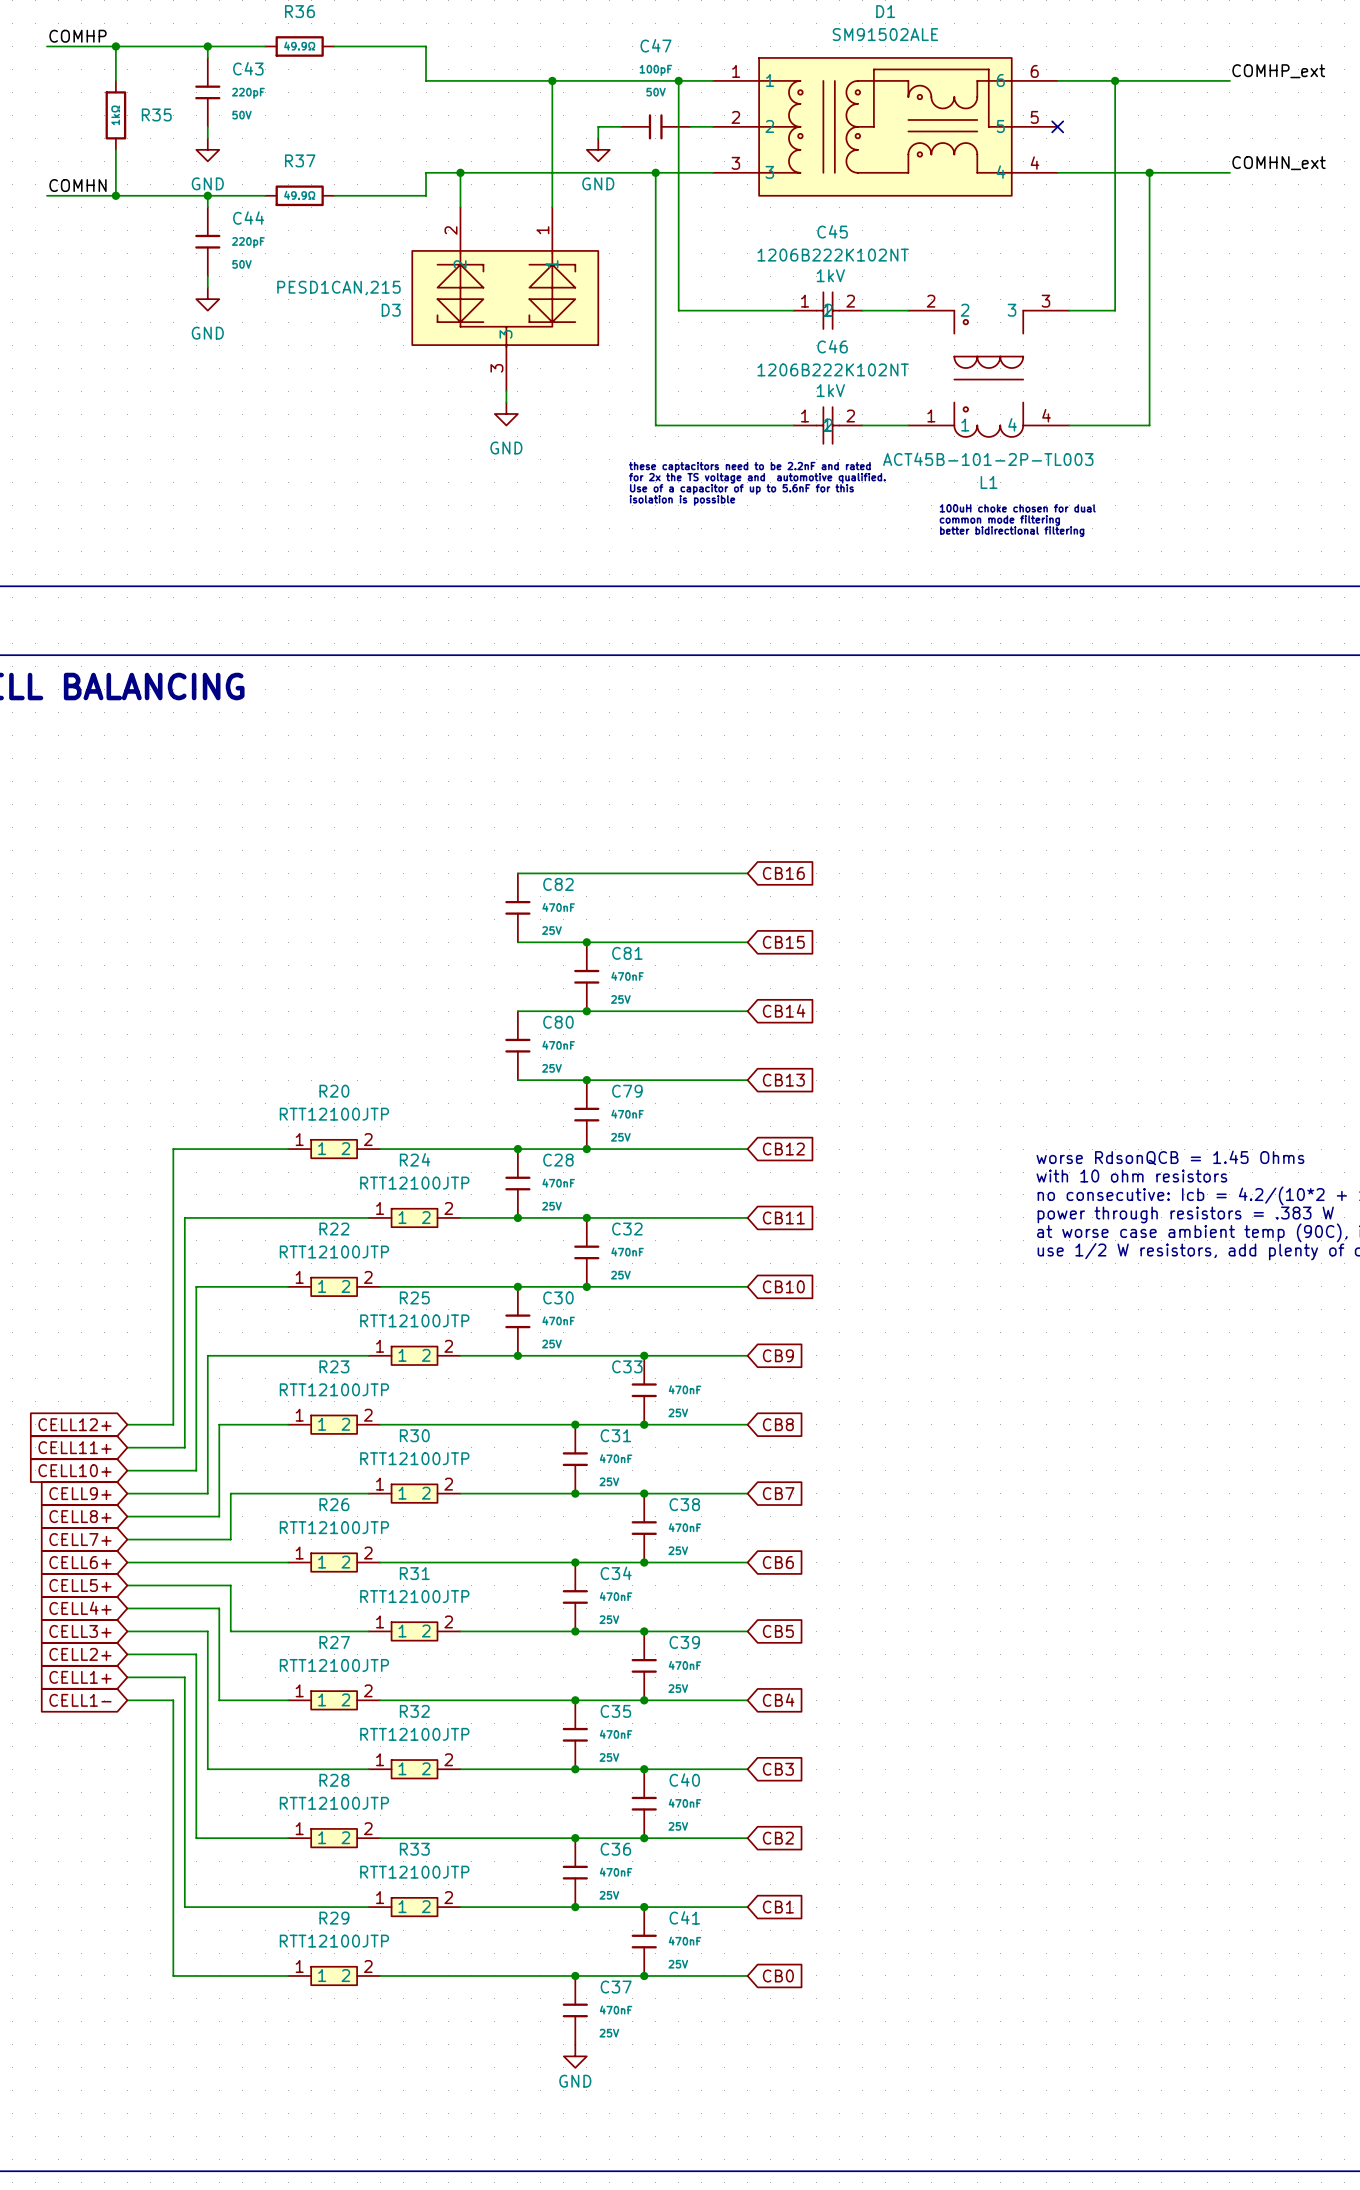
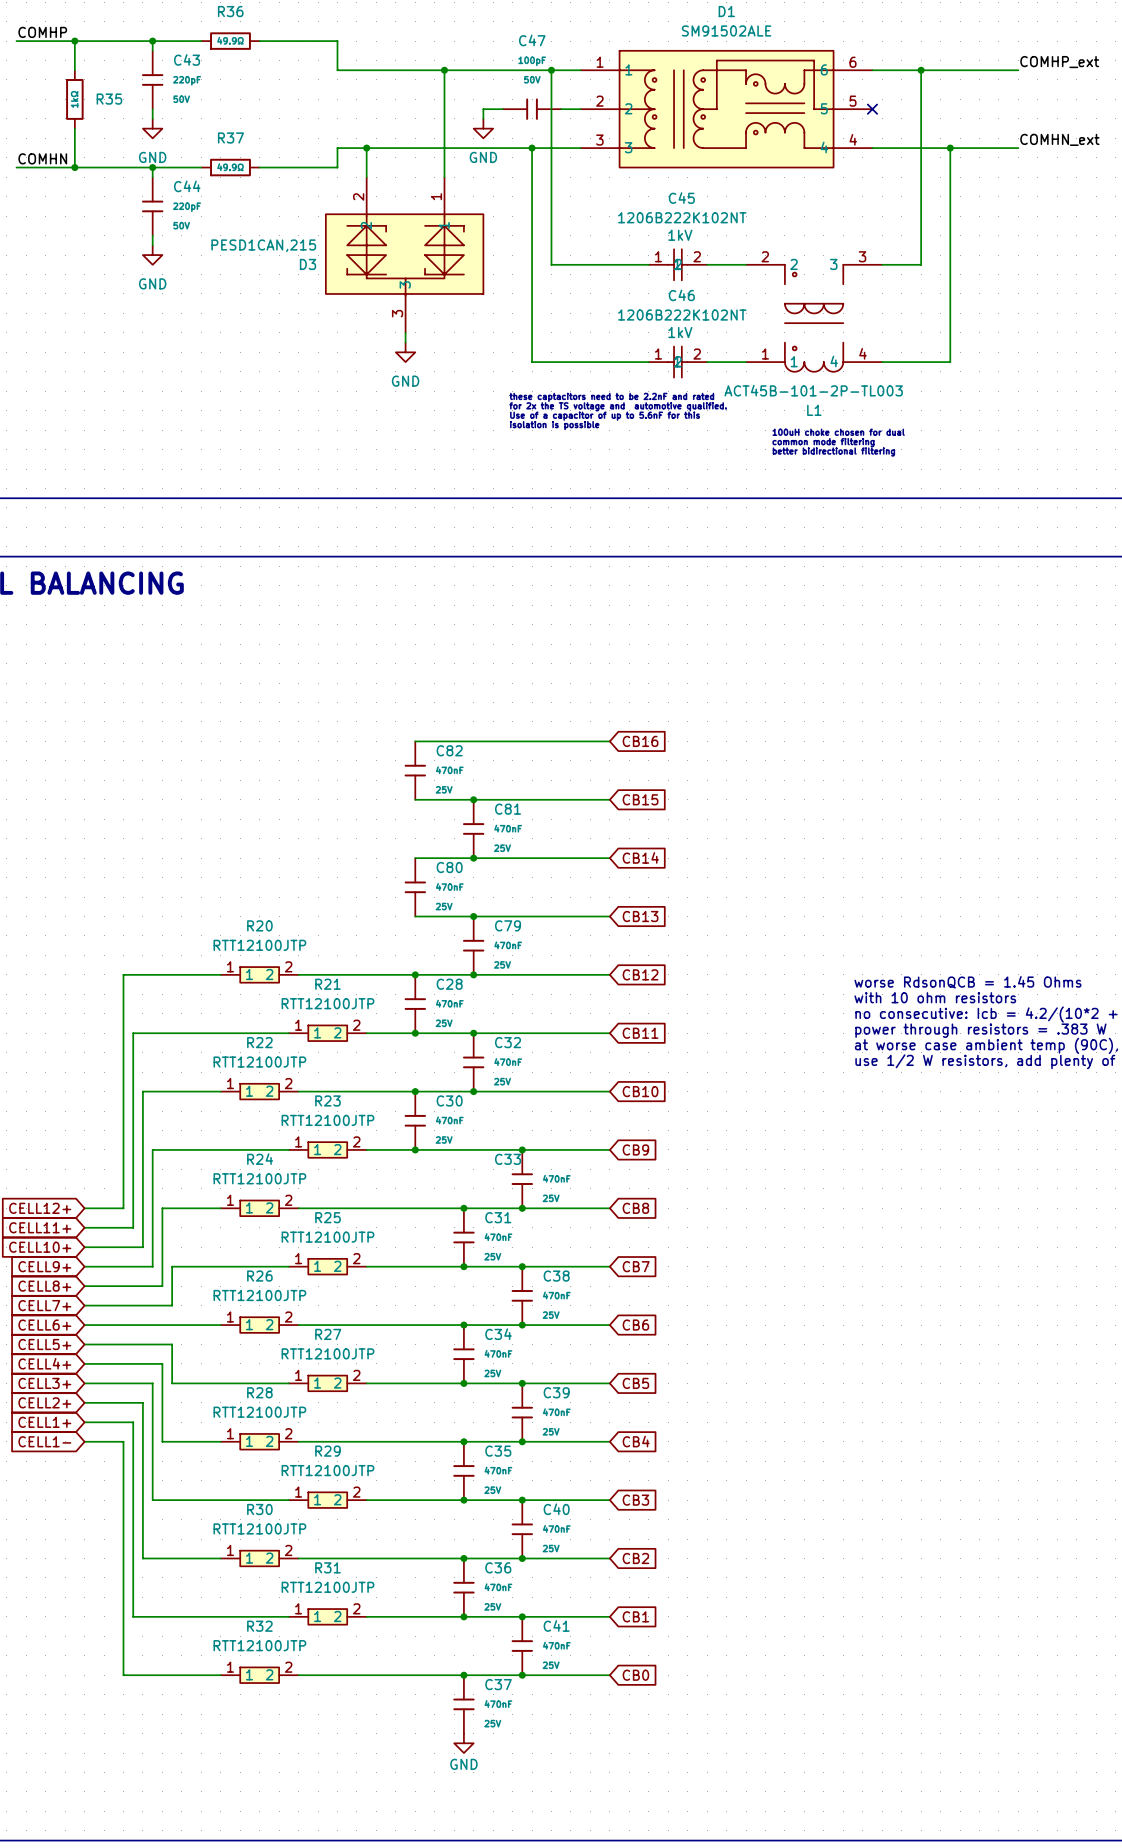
R24 name: R24 (415, 1159) -> R21 (327, 984)
R25 name: R25 (414, 1297) -> R23 (327, 1100)
R23 name: R23 (334, 1366) -> R24 (260, 1159)
R30 name: R30 (414, 1435) -> R25 (327, 1217)
R31 name: R31 (414, 1573) -> R27 (328, 1334)
R27 name: R27 (334, 1642) -> R28 (259, 1392)
R32 name: R32 (414, 1711) -> R29 (327, 1451)
R28 name: R28 (334, 1780) -> R30 (259, 1509)
R33 name: R33 (414, 1849) -> R31 (327, 1567)
R29 name: R29 (334, 1918) -> R32 (259, 1626)

